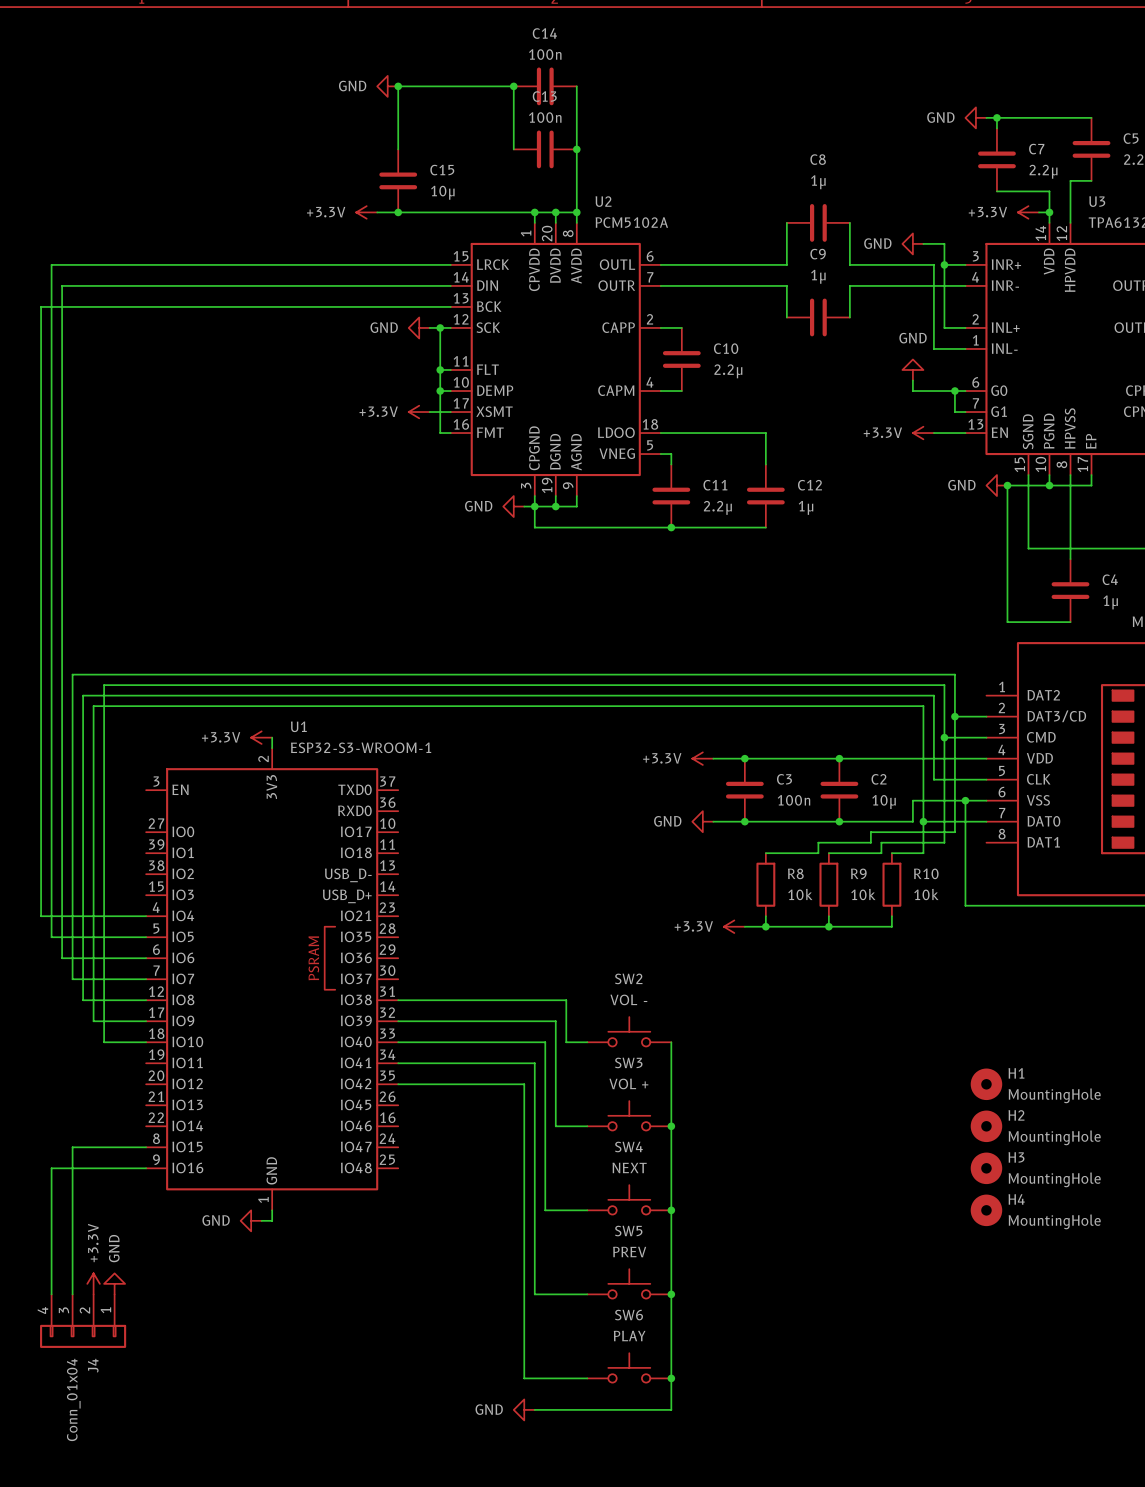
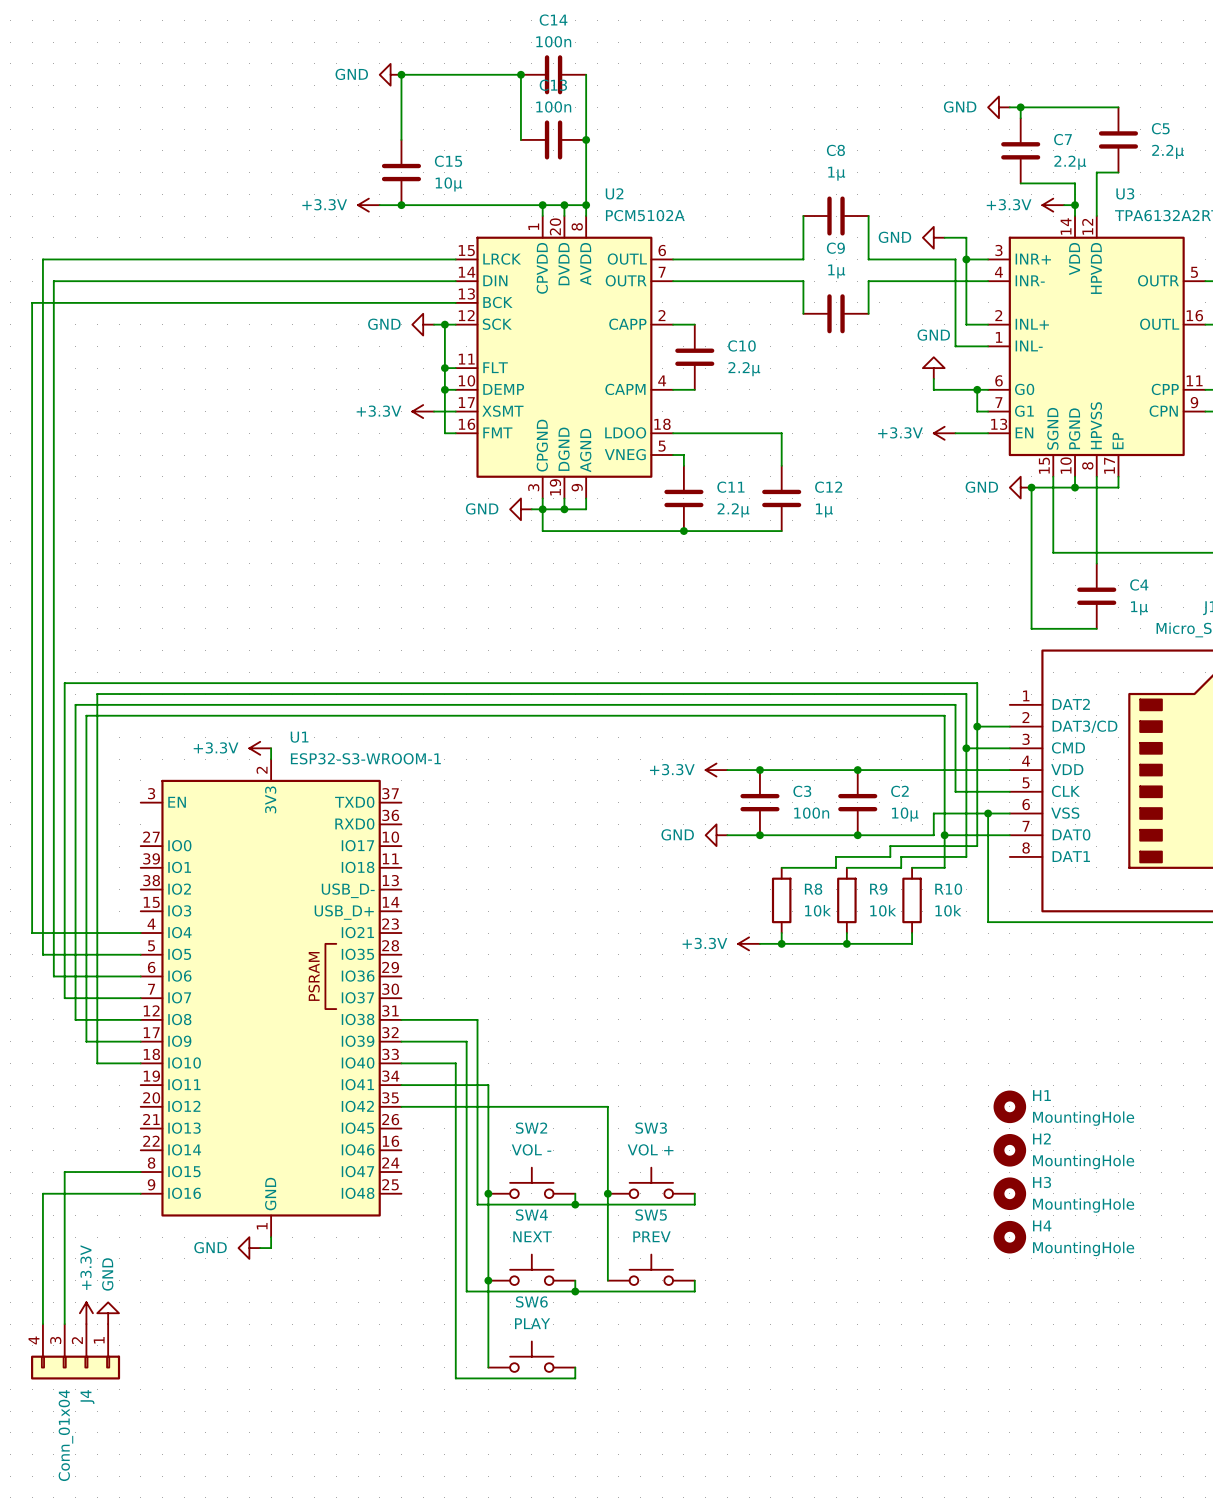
wire: (471, 1000) (566, 1000) (566, 1042) (587, 1042) -> (477, 1019) (477, 1204) (694, 1204) (694, 1193)
wire: (461, 1021) (555, 1021) (555, 1126) (587, 1126) -> (466, 1041) (466, 1291) (694, 1291) (694, 1280)
SW2 position: (629, 1031) -> (531, 1182)
wire: (450, 1042) (545, 1042) (545, 1210) (587, 1210) -> (455, 1063) (455, 1378) (575, 1378) (575, 1367)
wire: (671, 1042) (671, 1409) (534, 1409) -> none
wire: (482, 1063) (534, 1063) (534, 1294) (587, 1294) -> (488, 1085) (488, 1367)
wire: (524, 1084) (524, 1378) (587, 1378) -> (531, 1106) (607, 1106) (607, 1280)
SW3 position: (629, 1115) -> (651, 1182)
junction: (671, 1126) -> none
junction: none -> (488, 1193)
wire: none -> (575, 1193) (575, 1204)
junction: none -> (607, 1193)
junction: none -> (575, 1204)
SW4 position: (629, 1199) -> (531, 1269)
junction: (671, 1210) -> none
junction: none -> (488, 1280)
wire: none -> (575, 1280) (575, 1291)
junction: none -> (575, 1291)
SW5 position: (629, 1283) -> (651, 1269)
junction: (671, 1294) -> none
SW6 position: (629, 1367) -> (531, 1356)
junction: (671, 1378) -> none
power symbol: GND (524, 1409) -> none

